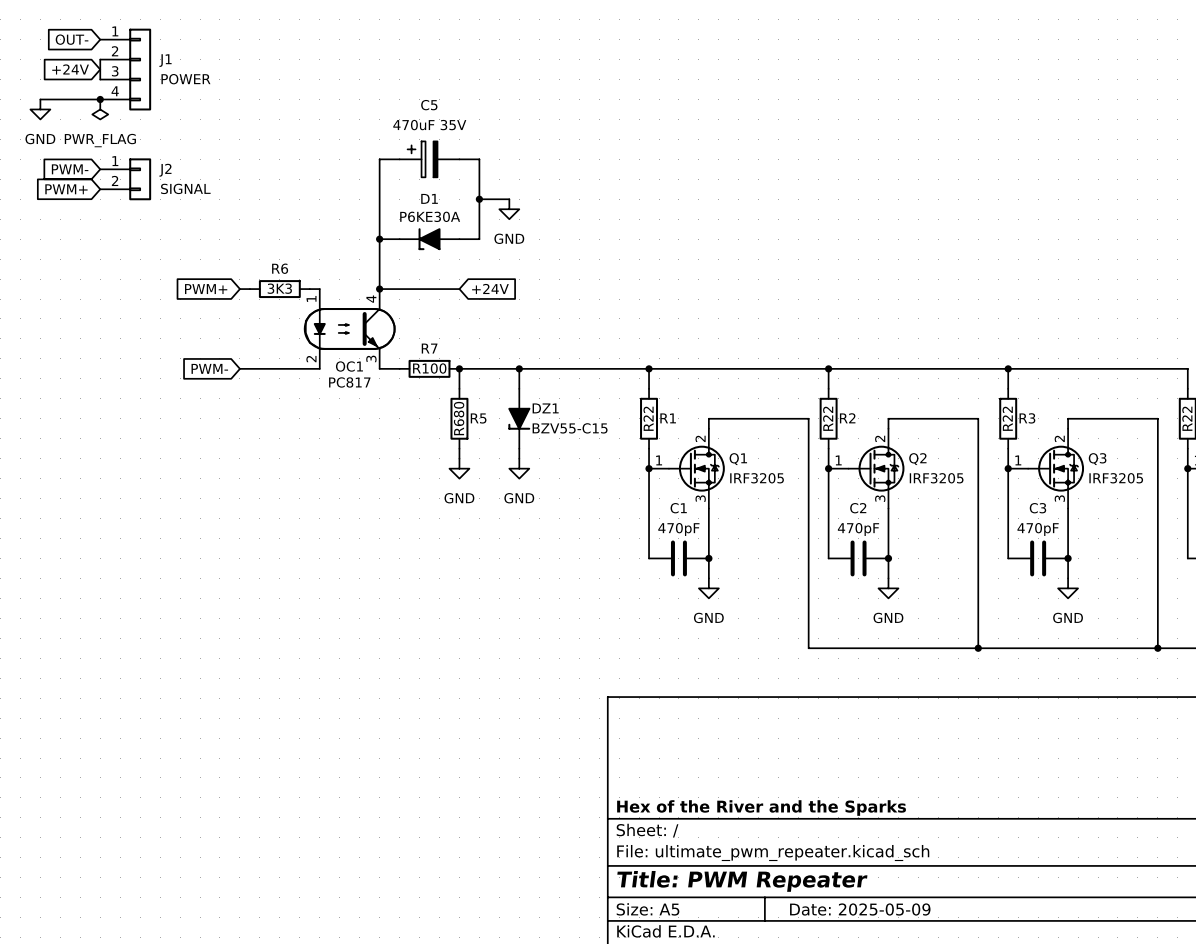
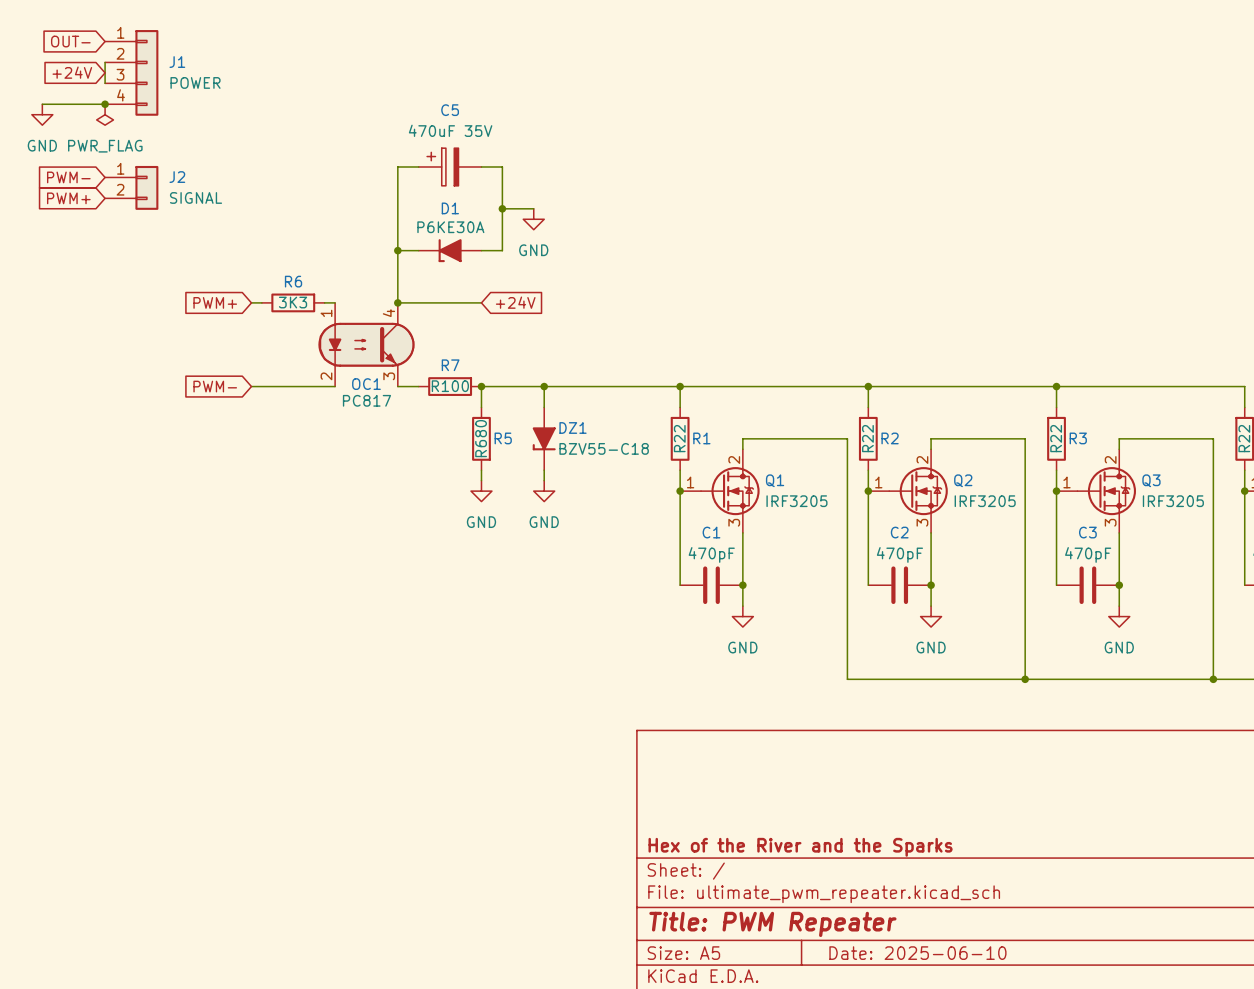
DZ1 value: BZV55-C15 (570, 428) -> BZV55-C18 (604, 448)
title block: Date: 2025-05-09 (860, 909) -> Date: 2025-06-10 (917, 953)

